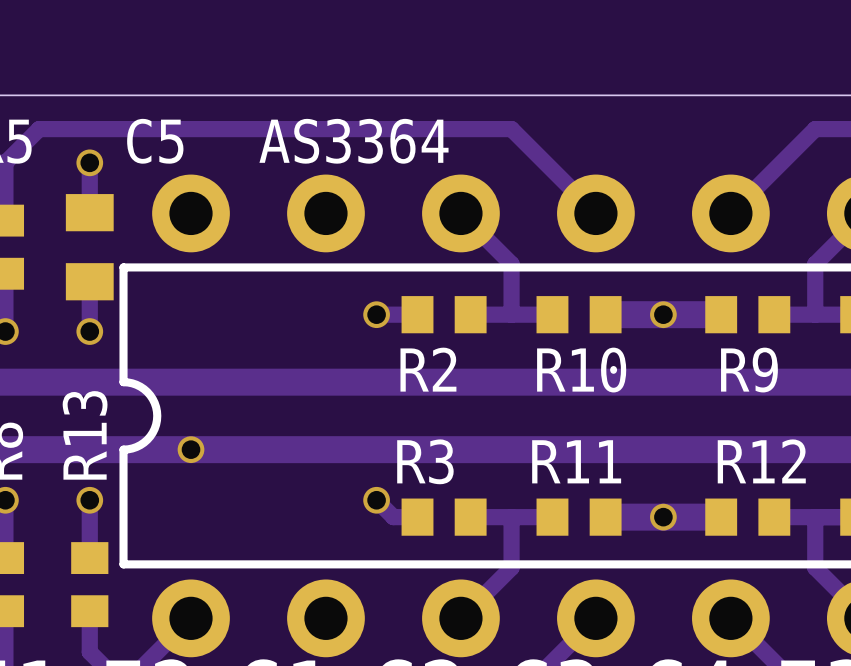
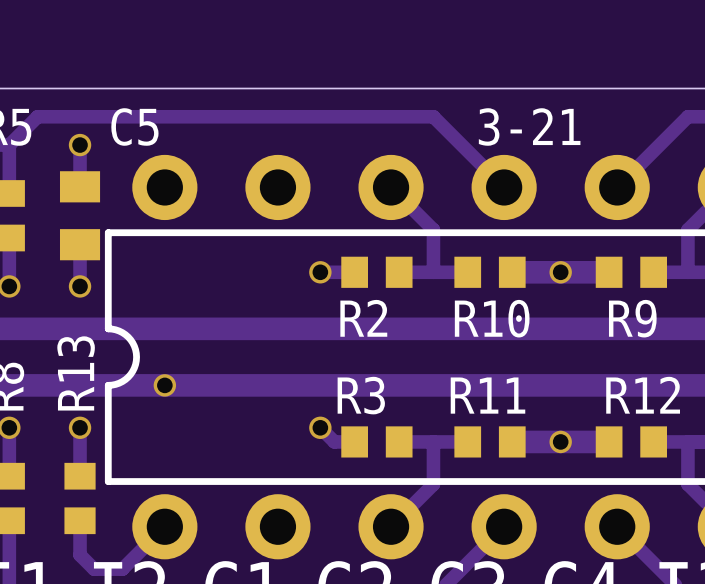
text: AS3364 (354, 141) -> none
text: none -> 3-21 (529, 126)

